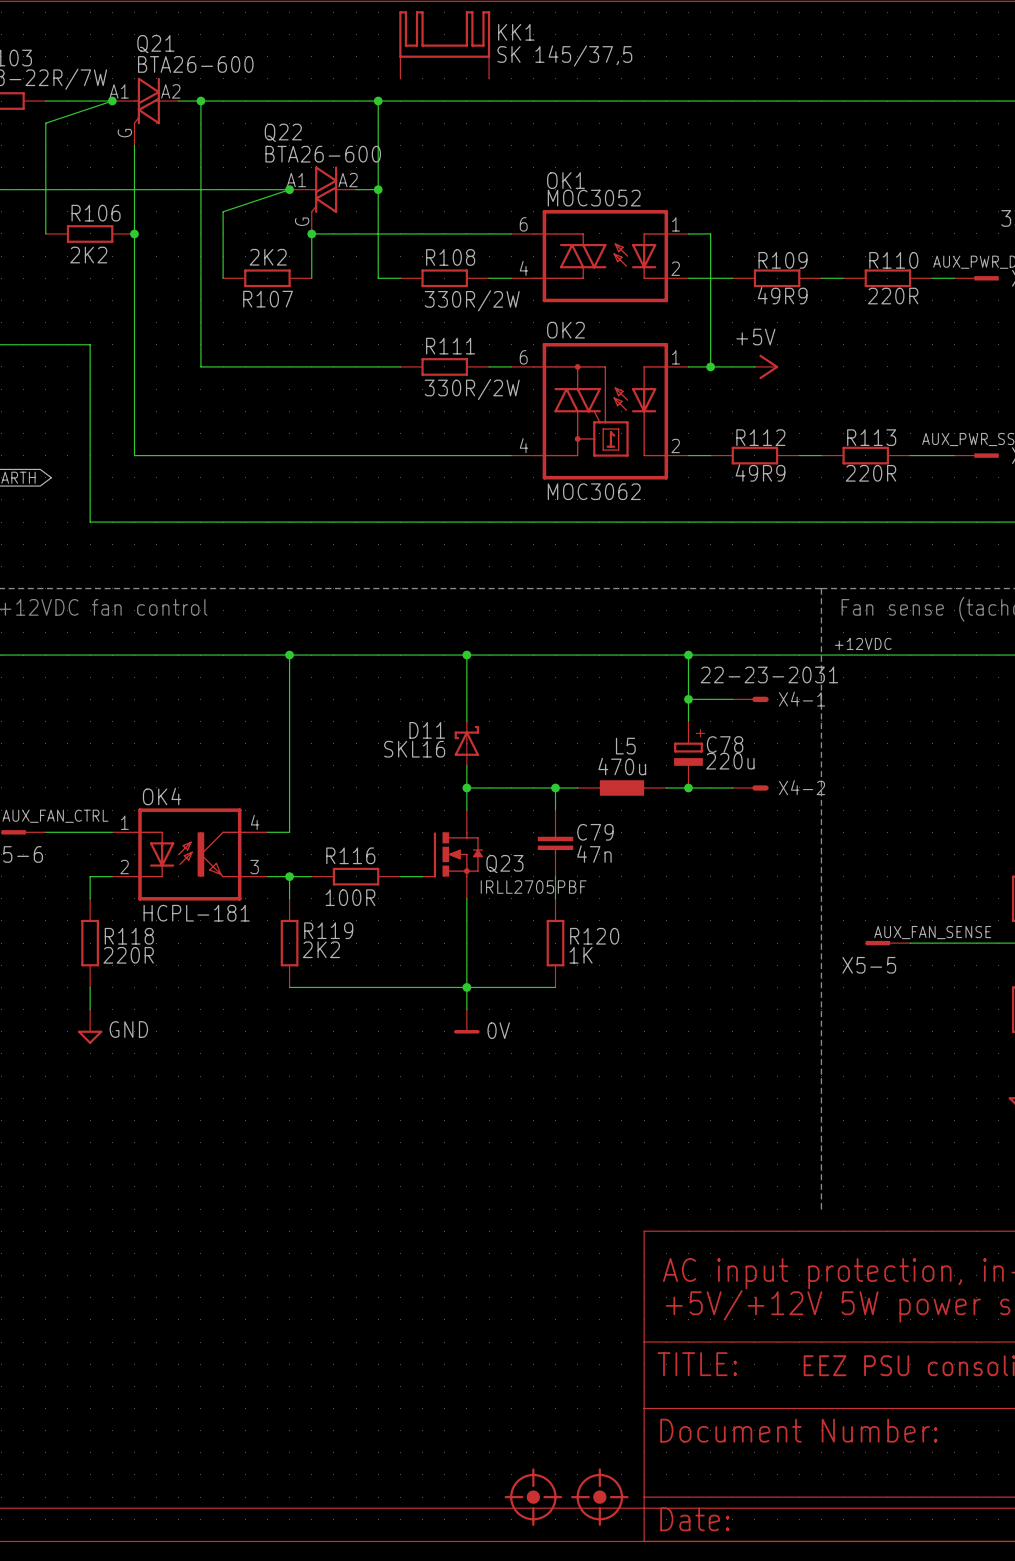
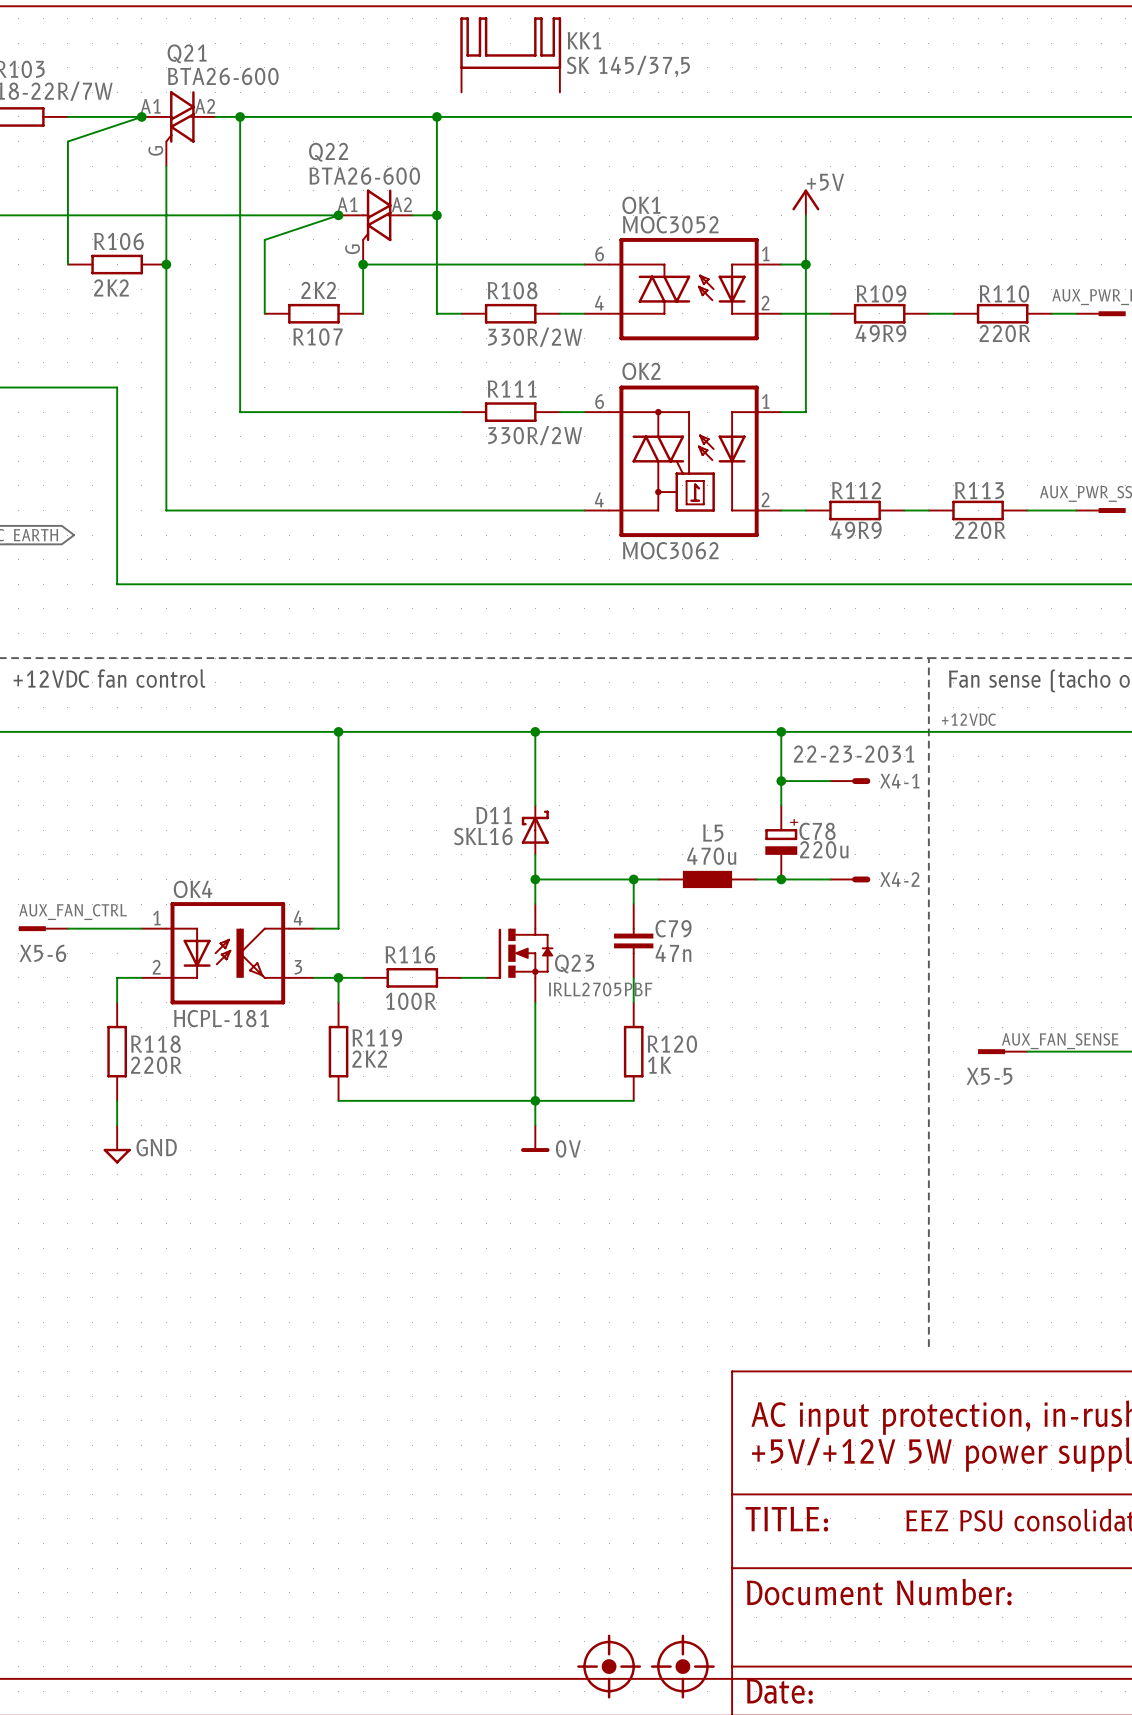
wire: none -> (805, 215) (805, 264)
junction: none -> (805, 264)
power symbol text position: +5V (755, 337) -> +5V (825, 182)
wire: (710, 366) (754, 366) -> none
junction: (710, 366) -> none
power symbol position: +5V (766, 366) -> +5V (805, 202)
power symbol rotation: 0° (768, 366) -> 90° counterclockwise (805, 199)

